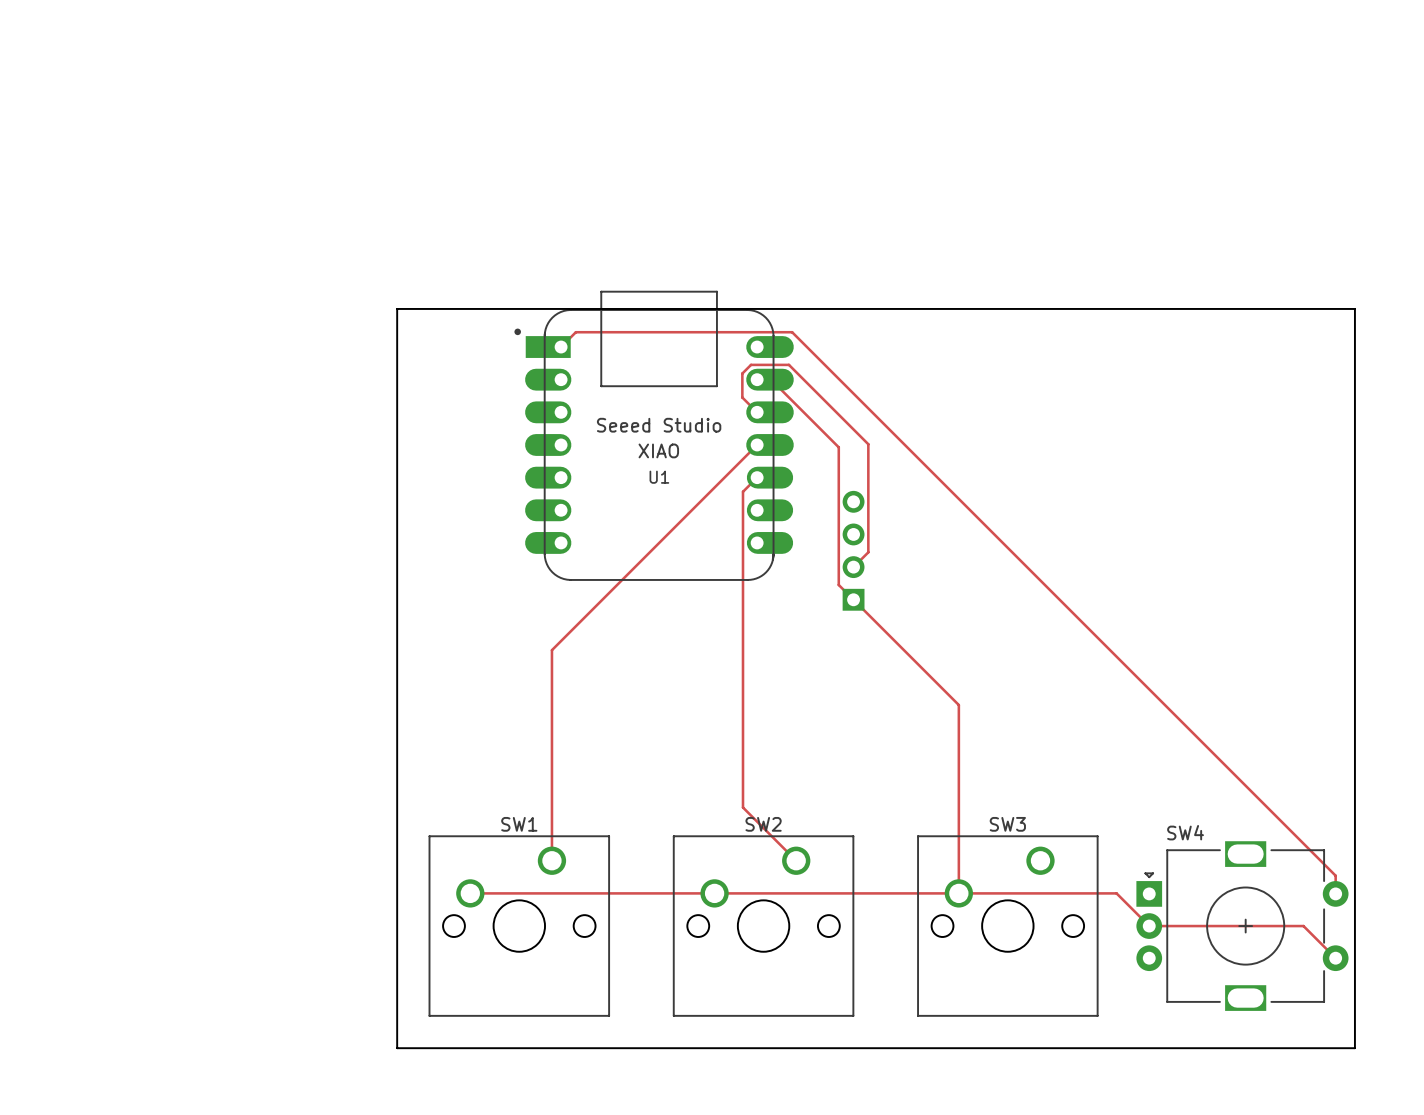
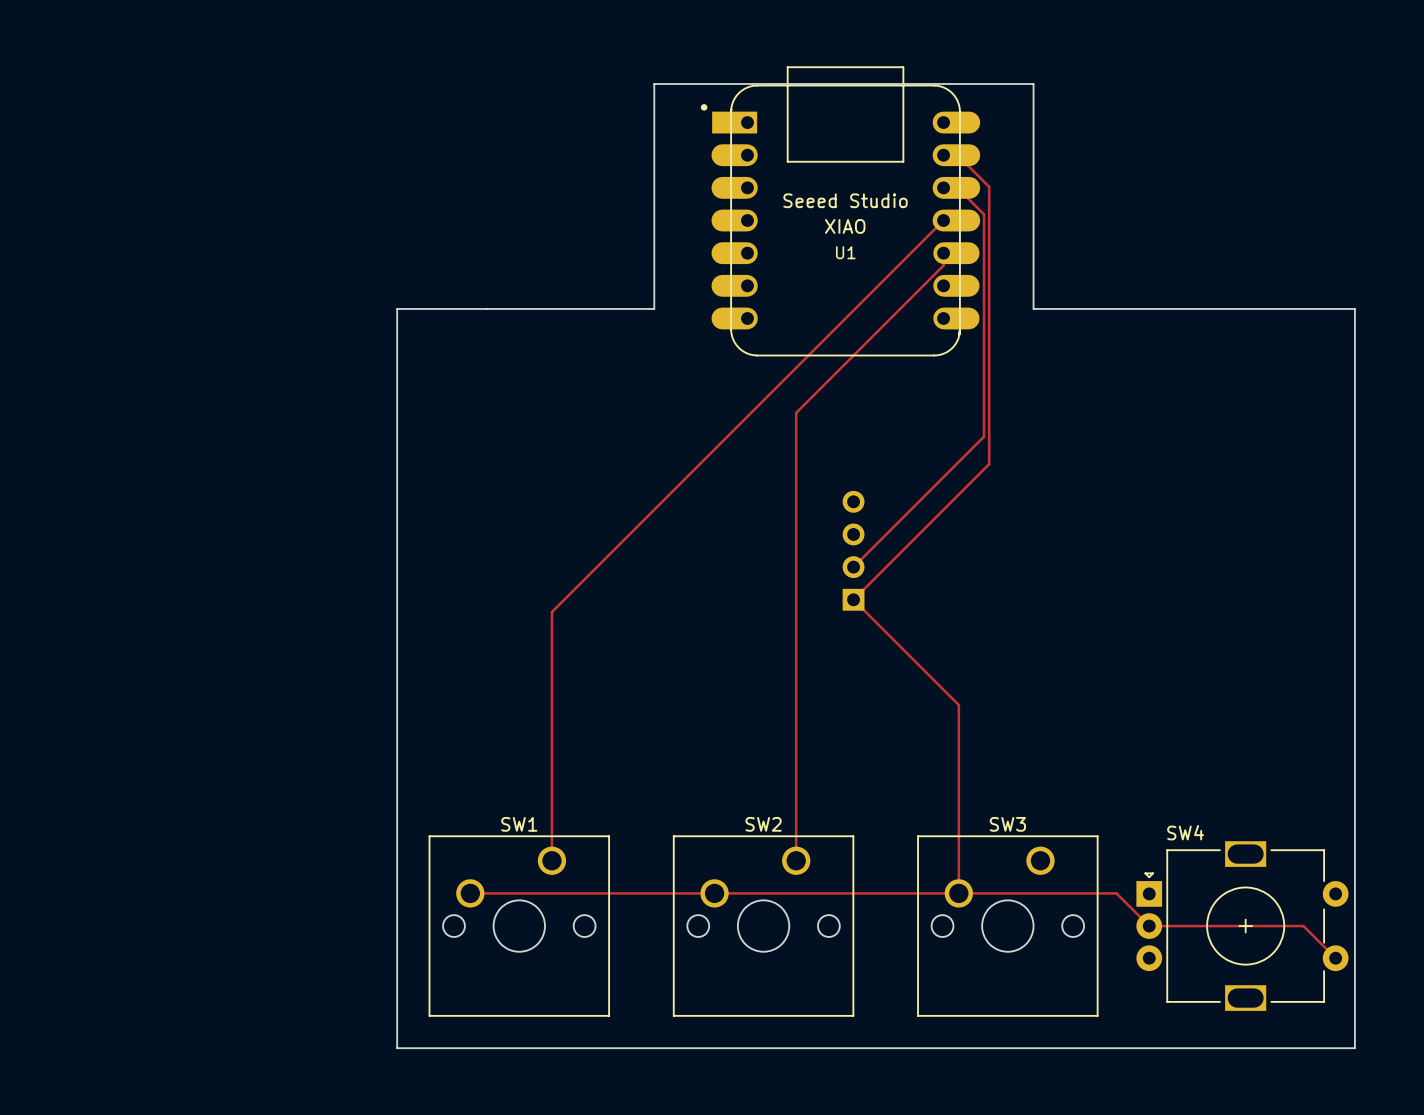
board edge: (654, 308) (1033, 308) -> (654, 308) (654, 83) (1033, 83) (1033, 308)
track: (561, 347) (575, 332) (792, 332) (1335, 875) (1335, 893) -> none
track: (757, 379) (771, 379) (838, 447) (838, 584) (853, 599) -> (943, 155) (957, 155) (989, 186) (989, 464) (853, 599)
track: (757, 412) (742, 397) (742, 373) (751, 364) (788, 364) (868, 444) (868, 552) -> (943, 187) (957, 187) (984, 214) (984, 436) (868, 552)
U1 position: (654, 435) -> (840, 211)
track: (757, 444) (551, 650) -> (943, 220) (551, 612) (551, 650)
track: (757, 477) (743, 491) (743, 807) (796, 860) -> (943, 253) (943, 265) (796, 412) (796, 860)

